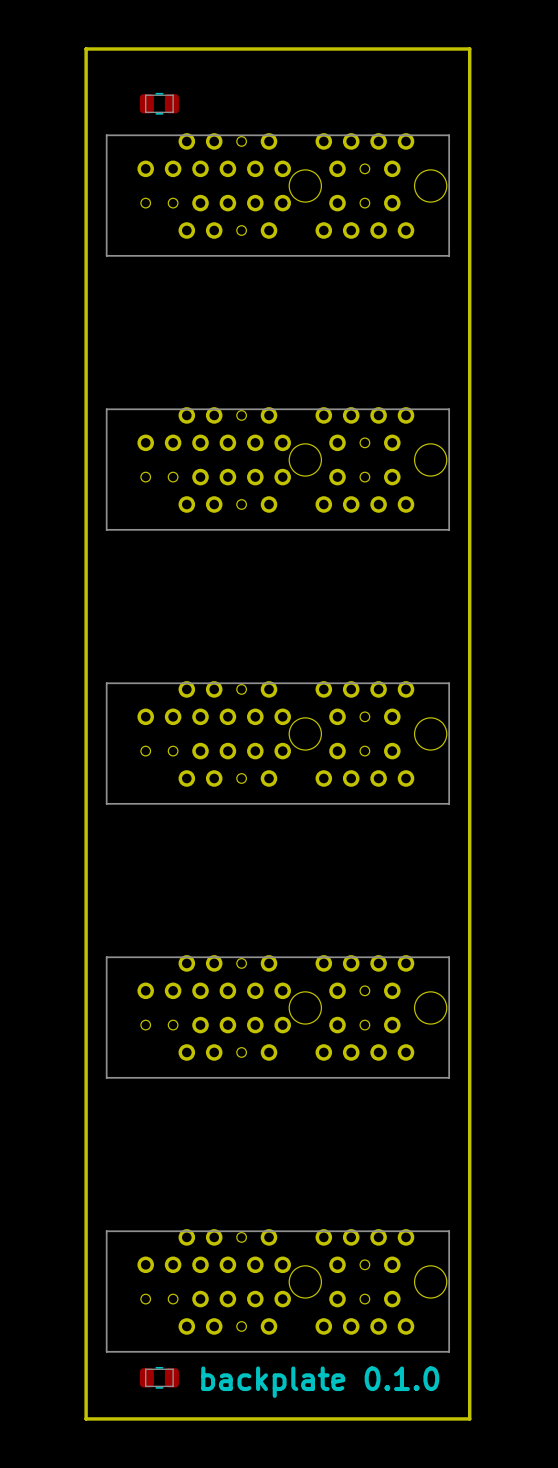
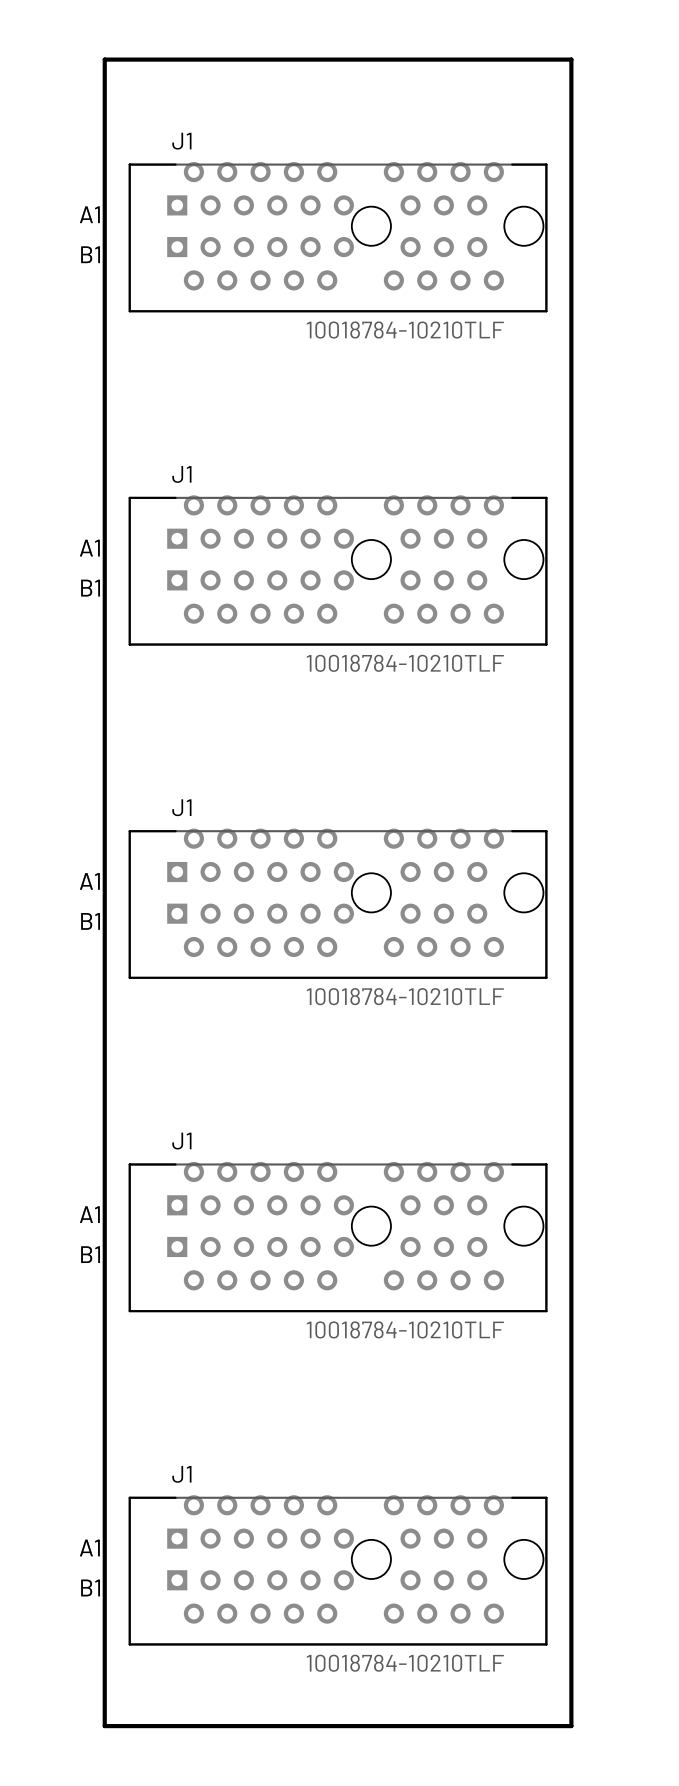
part: (159, 103) -> none
part: (277, 194) -> none
J1: none -> 10018784-10210TLF (338, 237)
part: (277, 468) -> none
J1: none -> 10018784-10210TLF (338, 570)
part: (277, 742) -> none
J1: none -> 10018784-10210TLF (338, 903)
part: (277, 1016) -> none
J1: none -> 10018784-10210TLF (338, 1237)
part: (277, 1290) -> none
J1: none -> 10018784-10210TLF (338, 1570)
part: (159, 1377) -> none
text: backplate 0.1.0 (320, 1382) -> none

